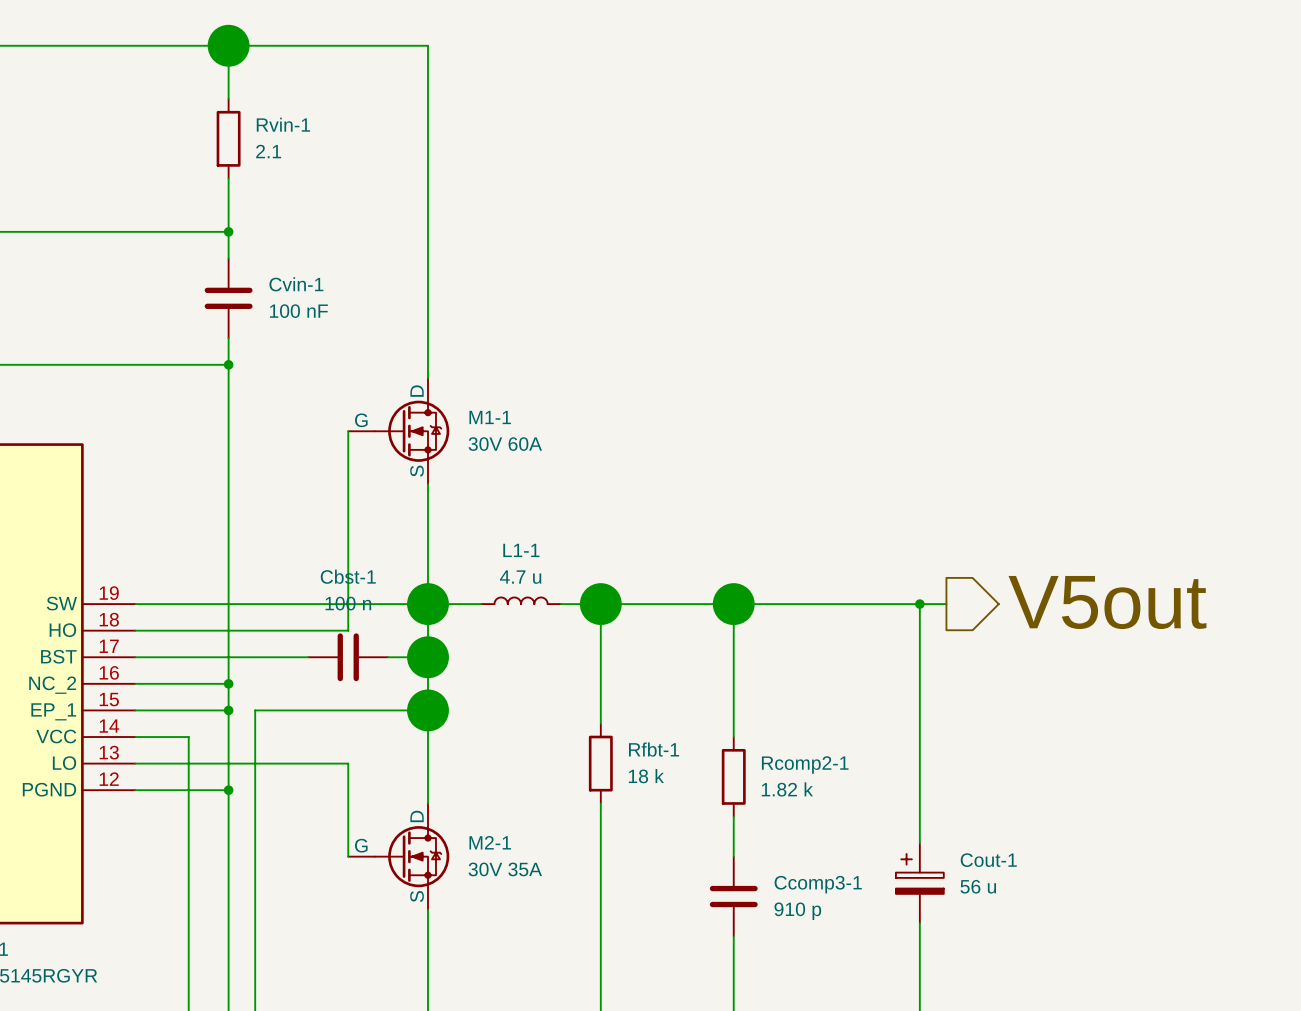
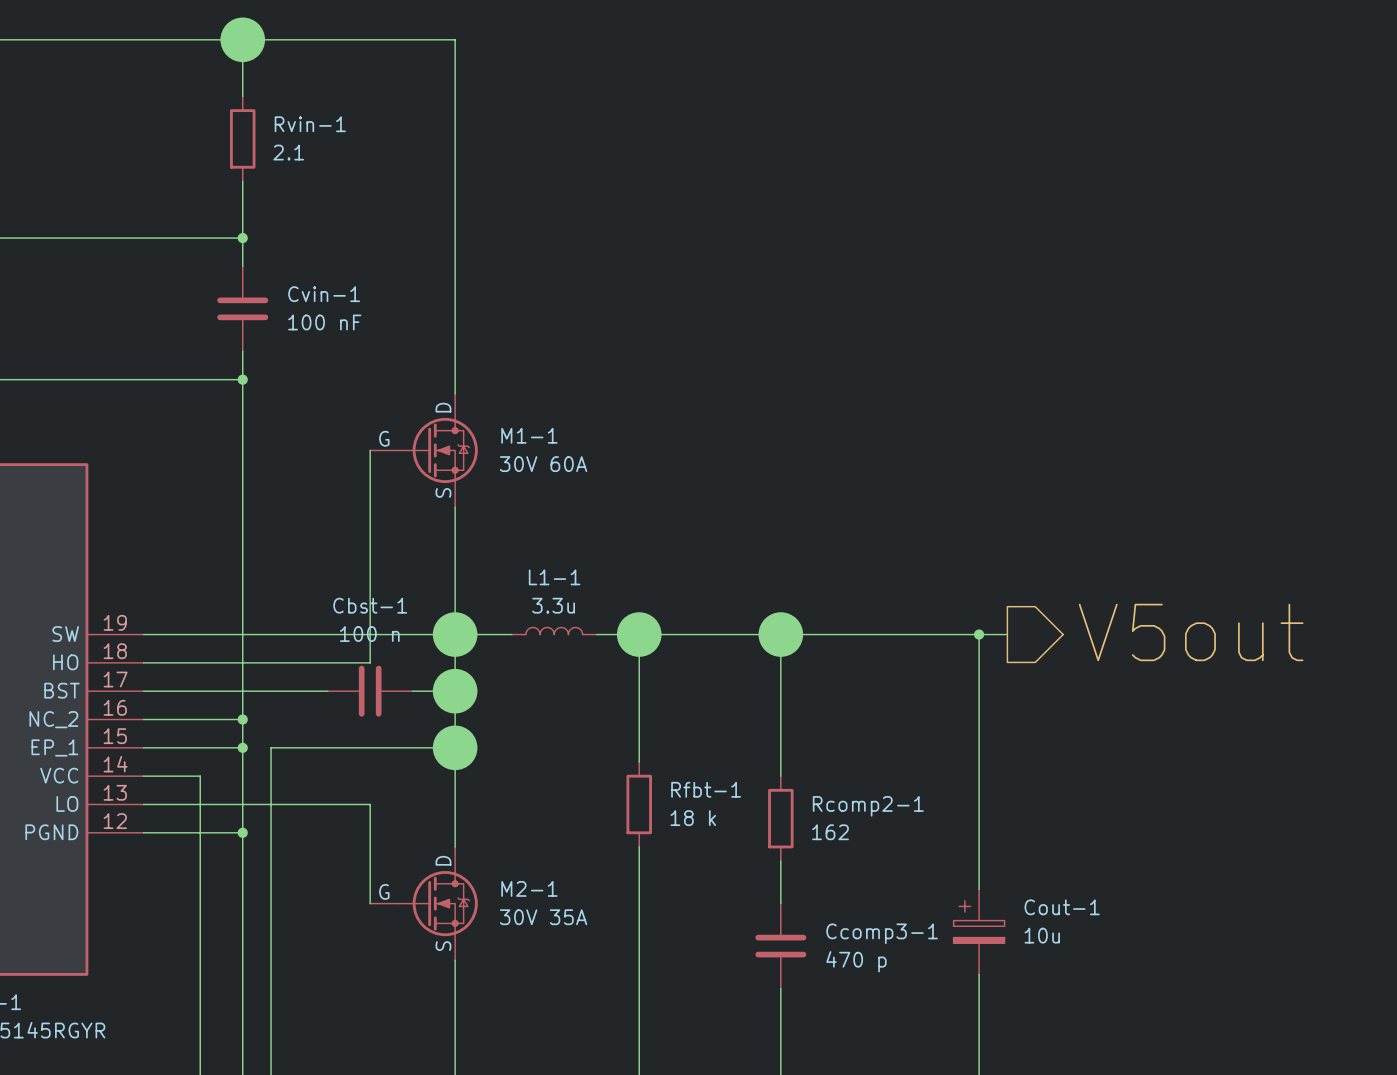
L1-1 value: 4.7 u (520, 577) -> 3.3u (553, 605)
Rcomp2-1 value: 1.82 k (787, 789) -> 162 (830, 832)
Cout-1 value: 56 u (978, 886) -> 10u (1042, 935)
Ccomp3-1 value: 910 p (797, 911) -> 470 p (856, 961)

